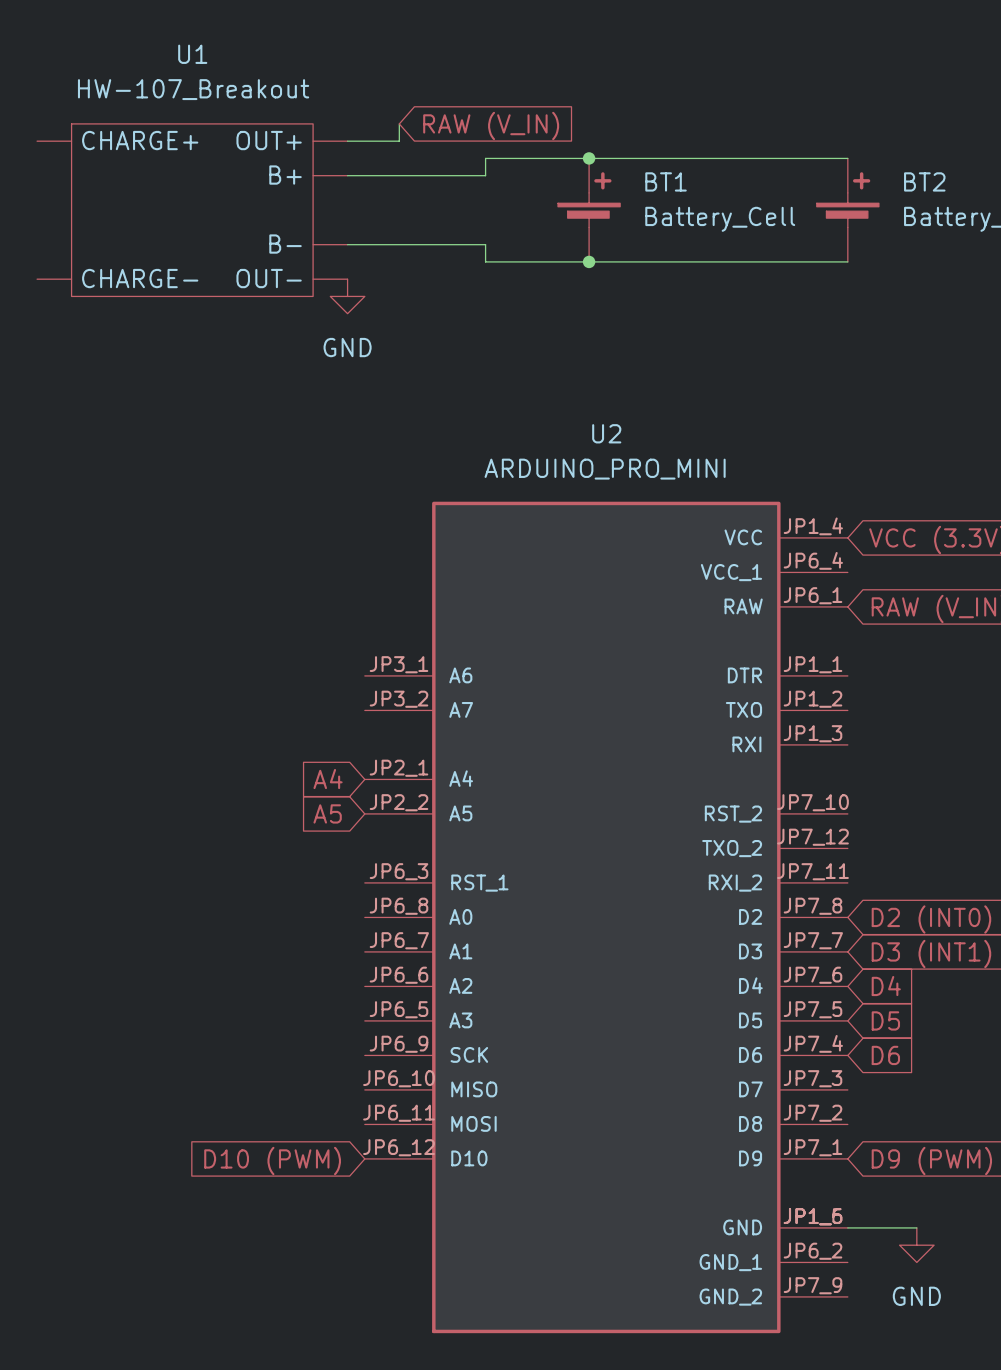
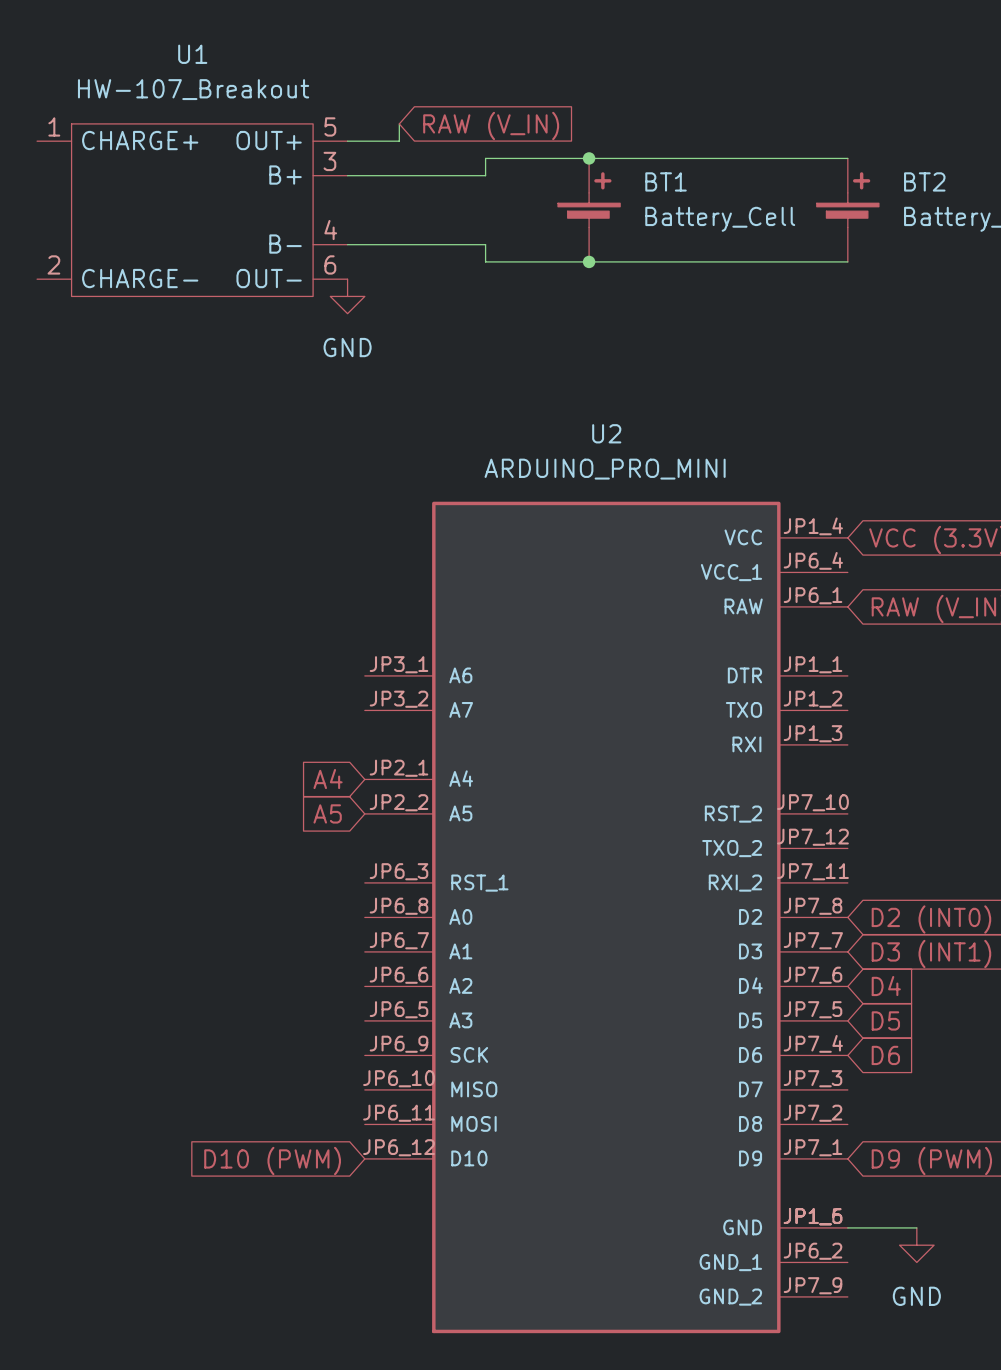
U1 pin number: none -> 1 (54, 126)
U1 pin number: none -> 5 (330, 126)
U1 pin number: none -> 3 (329, 161)
U1 pin number: none -> 4 (330, 230)
U1 pin number: none -> 2 (53, 264)
U1 pin number: none -> 6 (330, 264)

